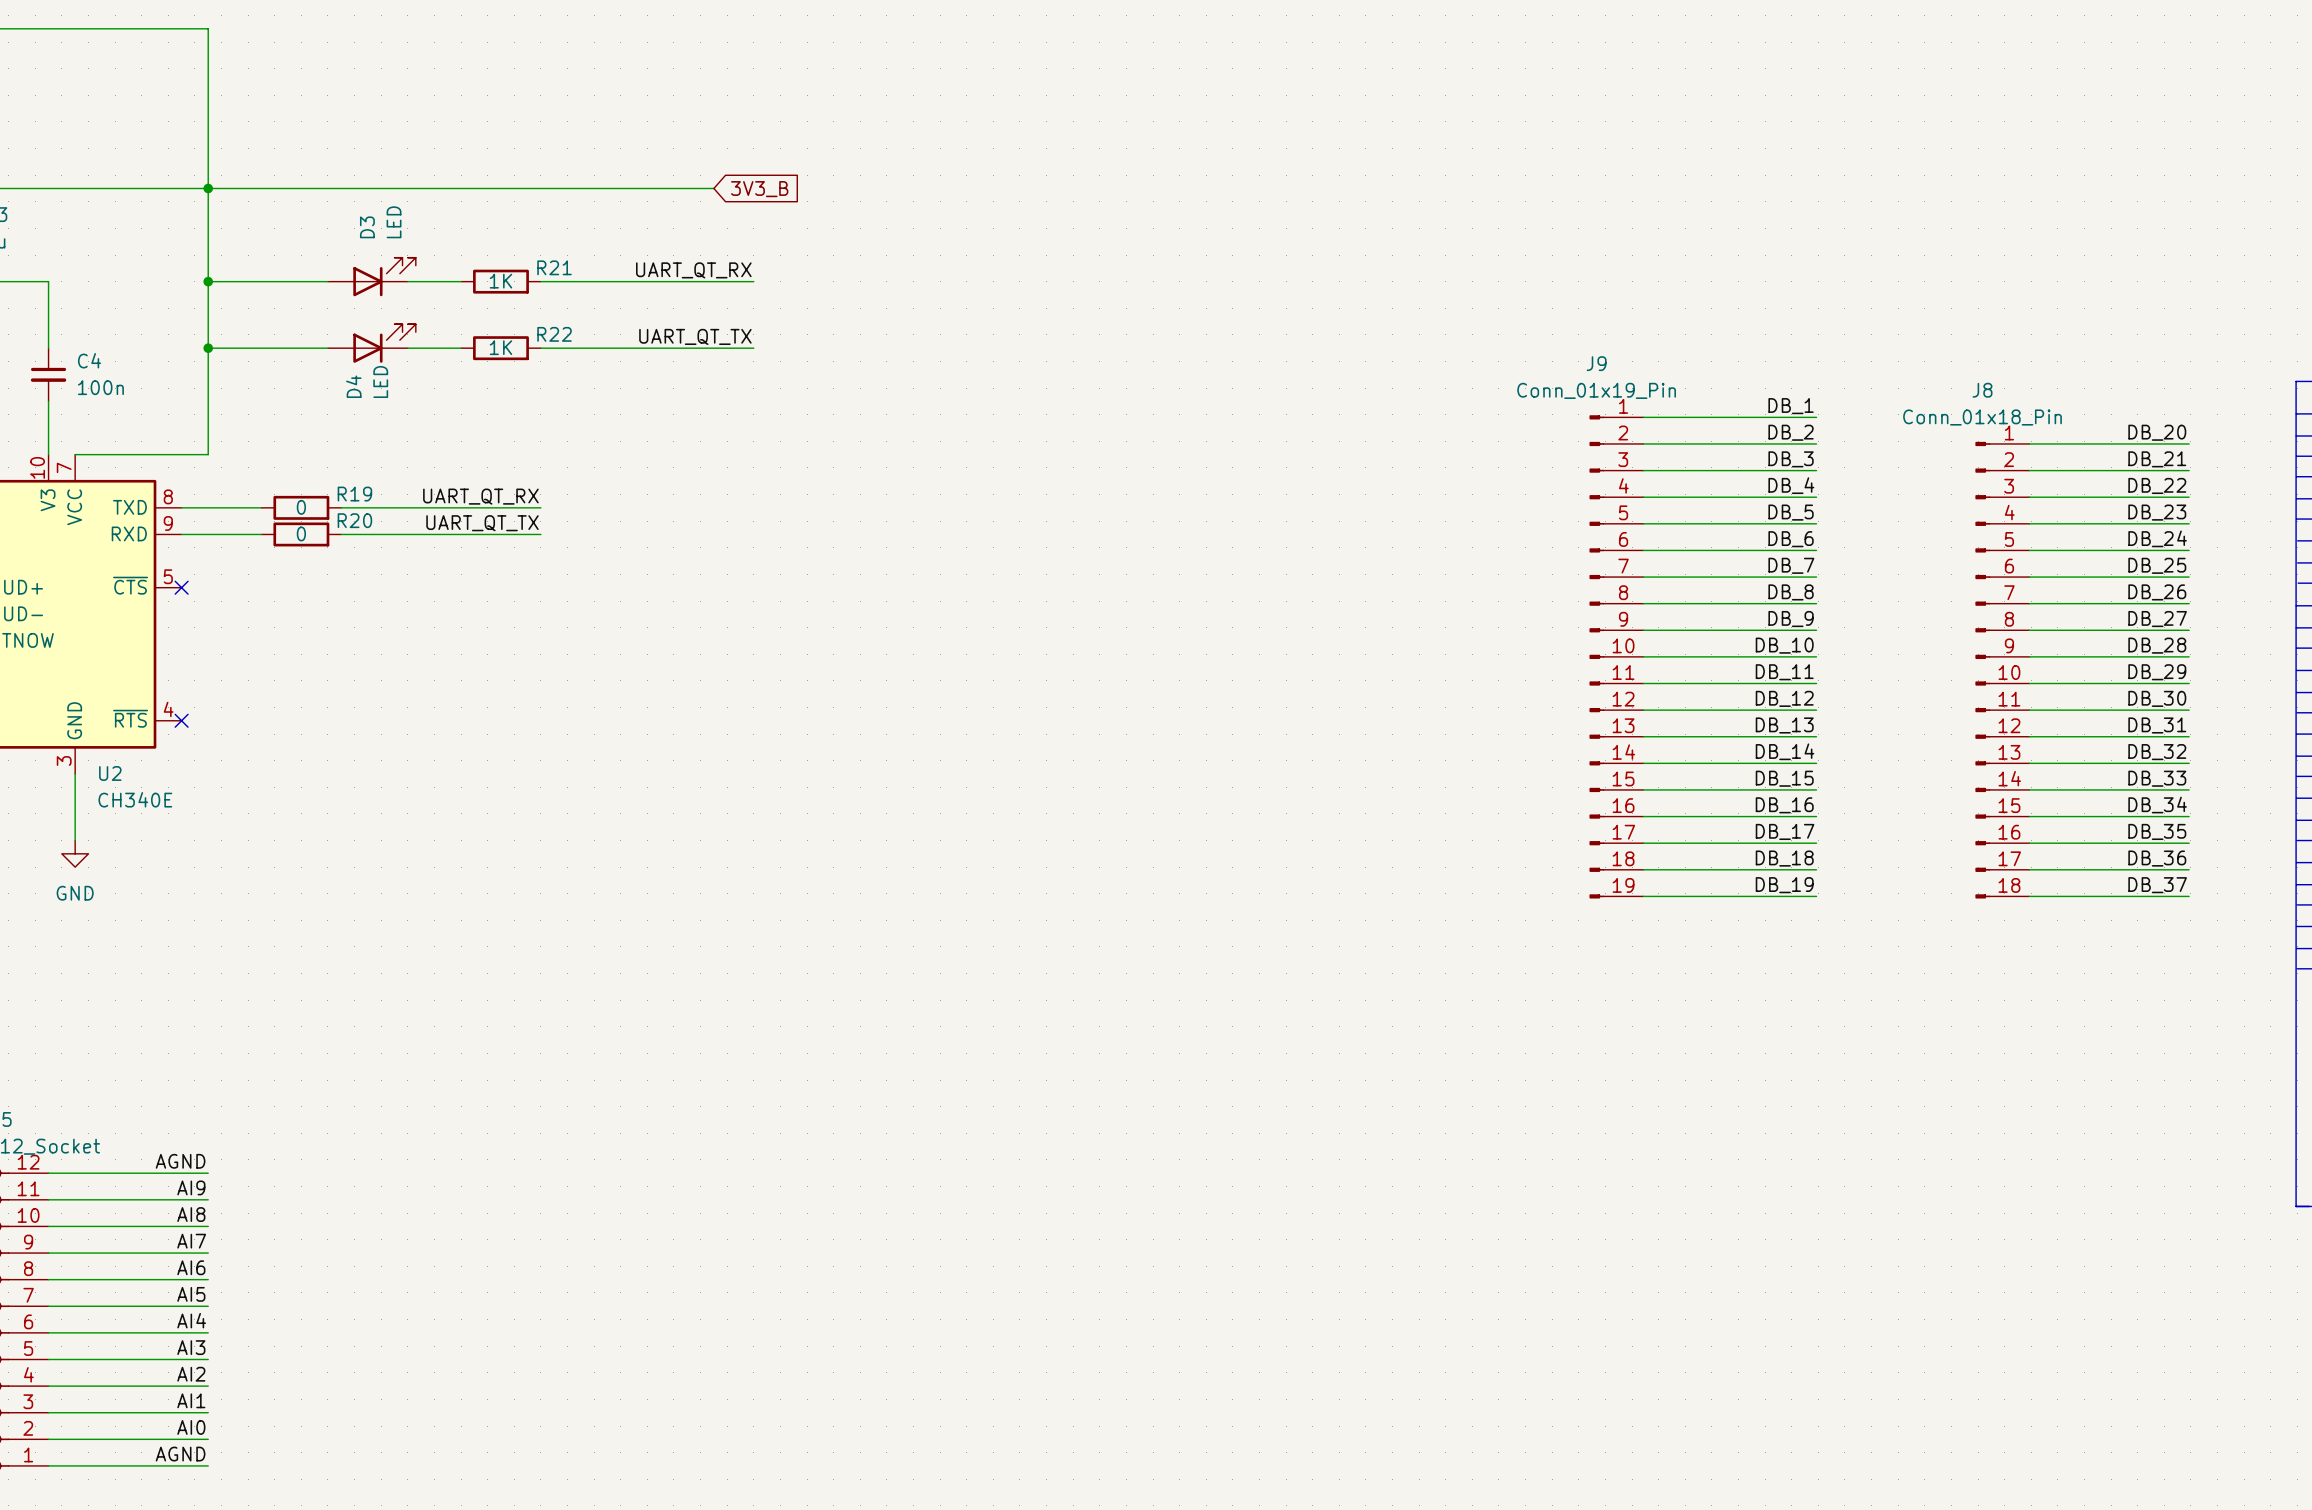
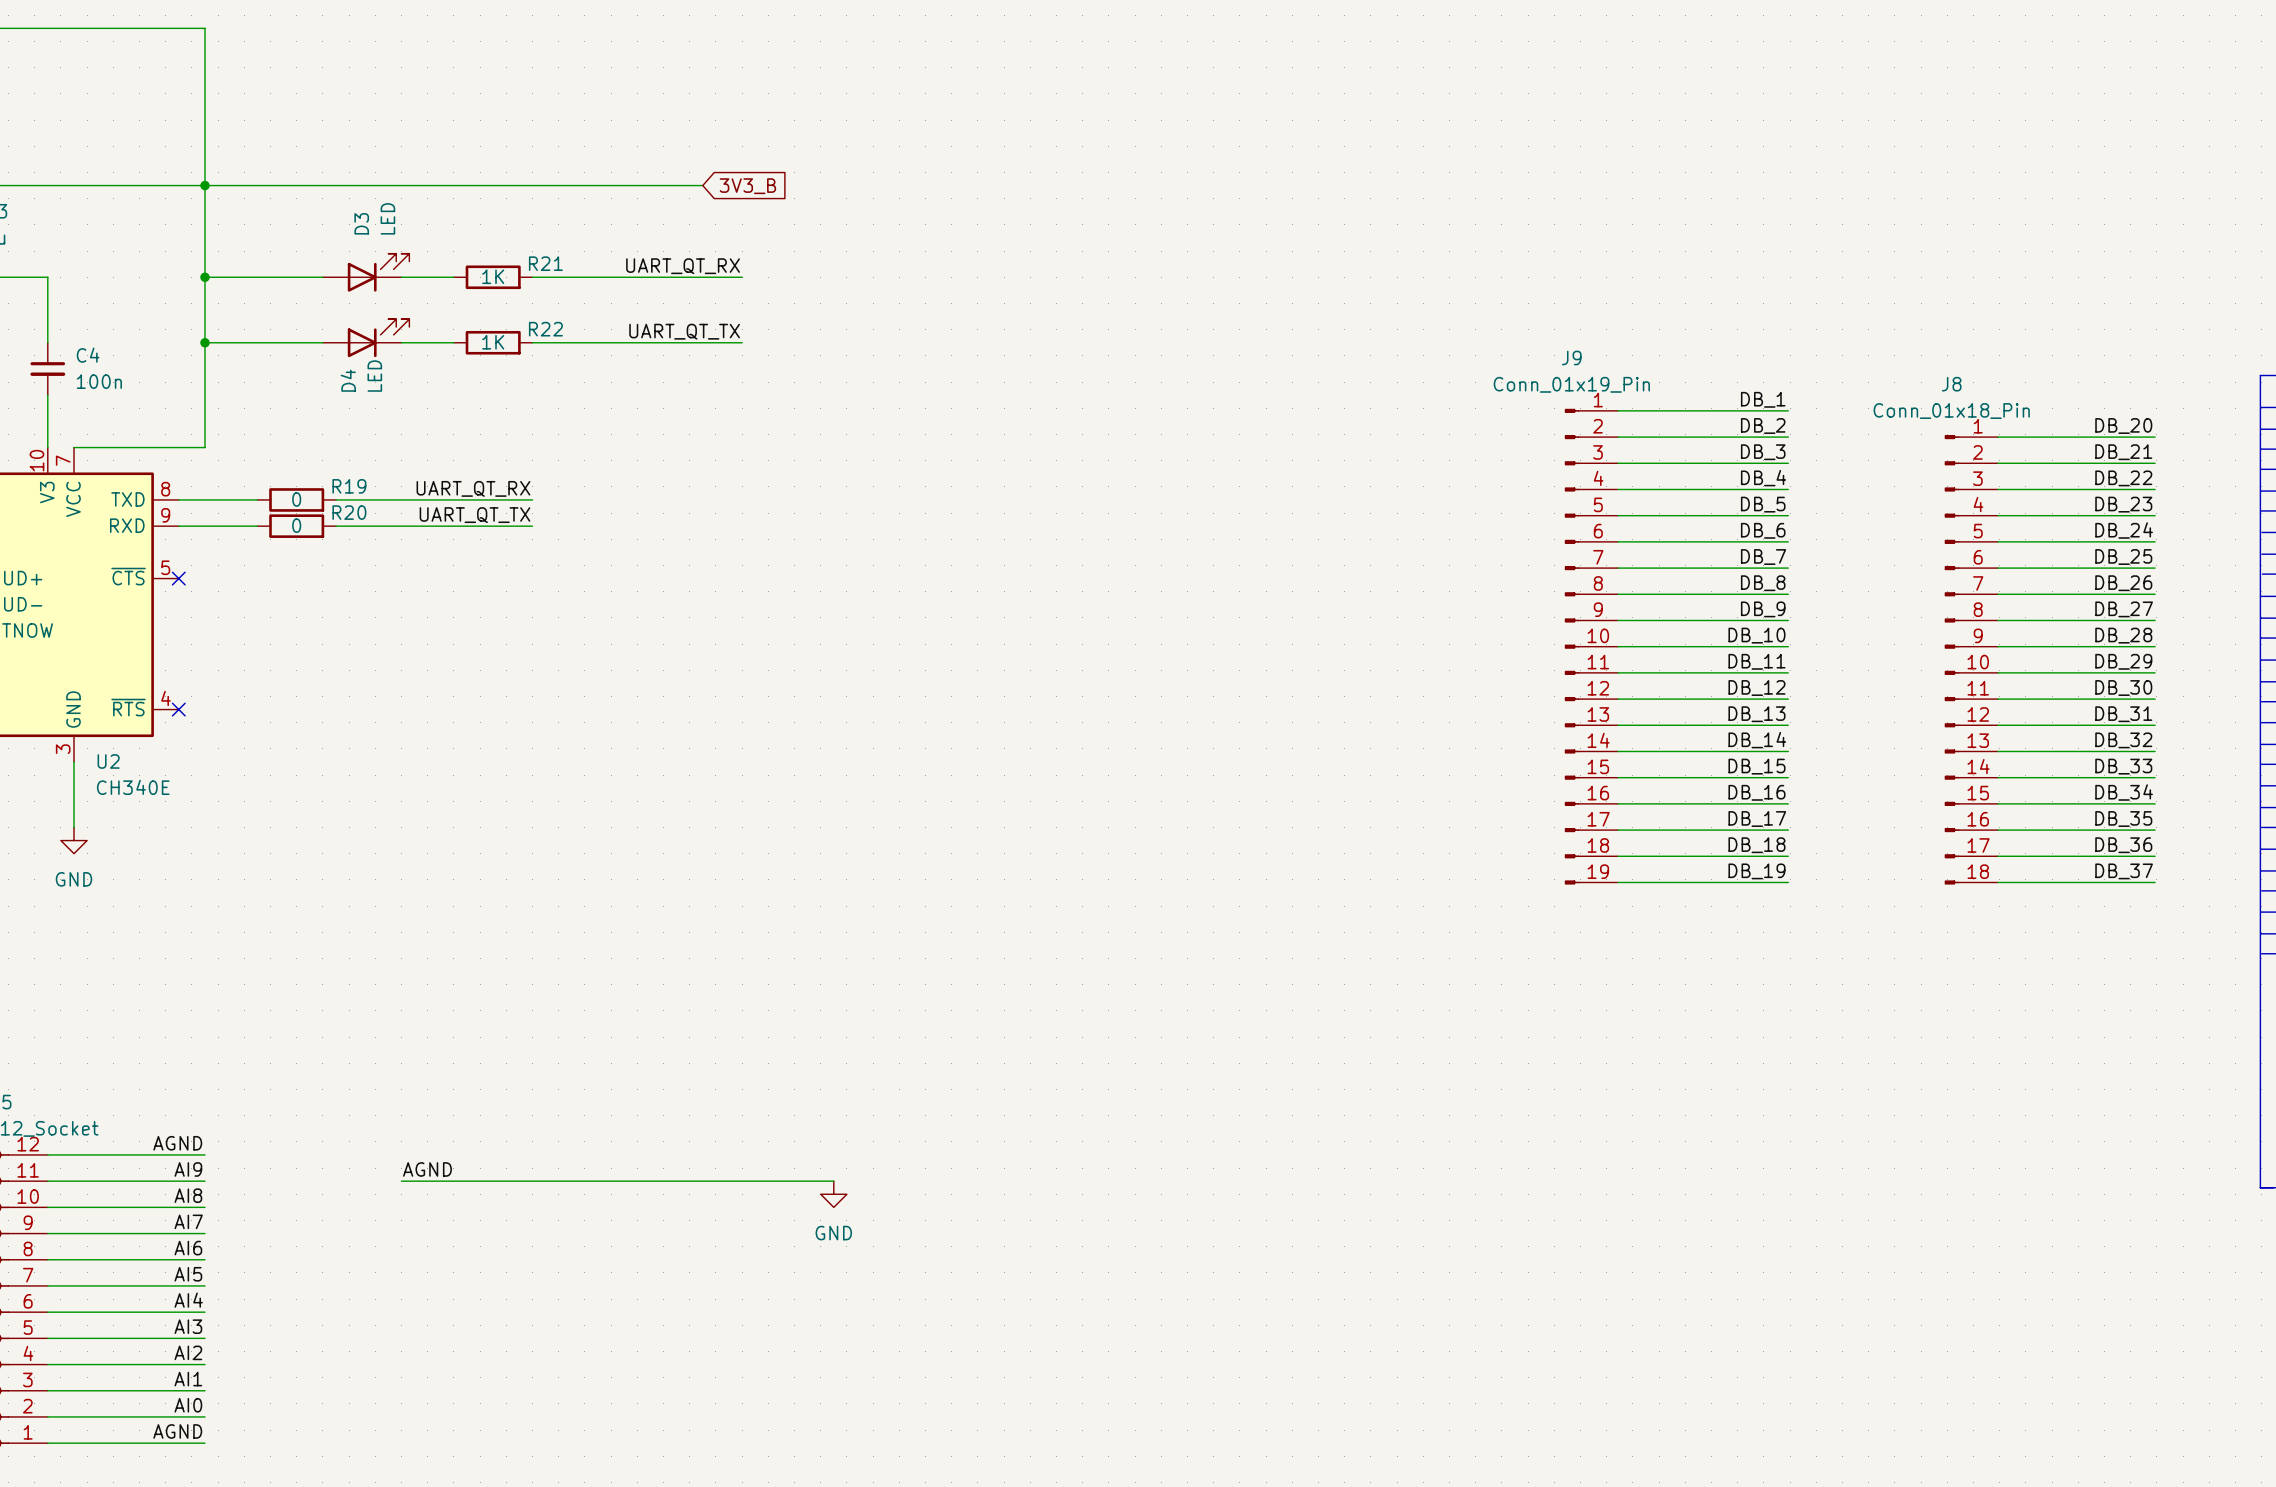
label: none -> AGND (427, 1169)
wire: none -> (401, 1181) (833, 1181)
power symbol: none -> GND (833, 1194)

